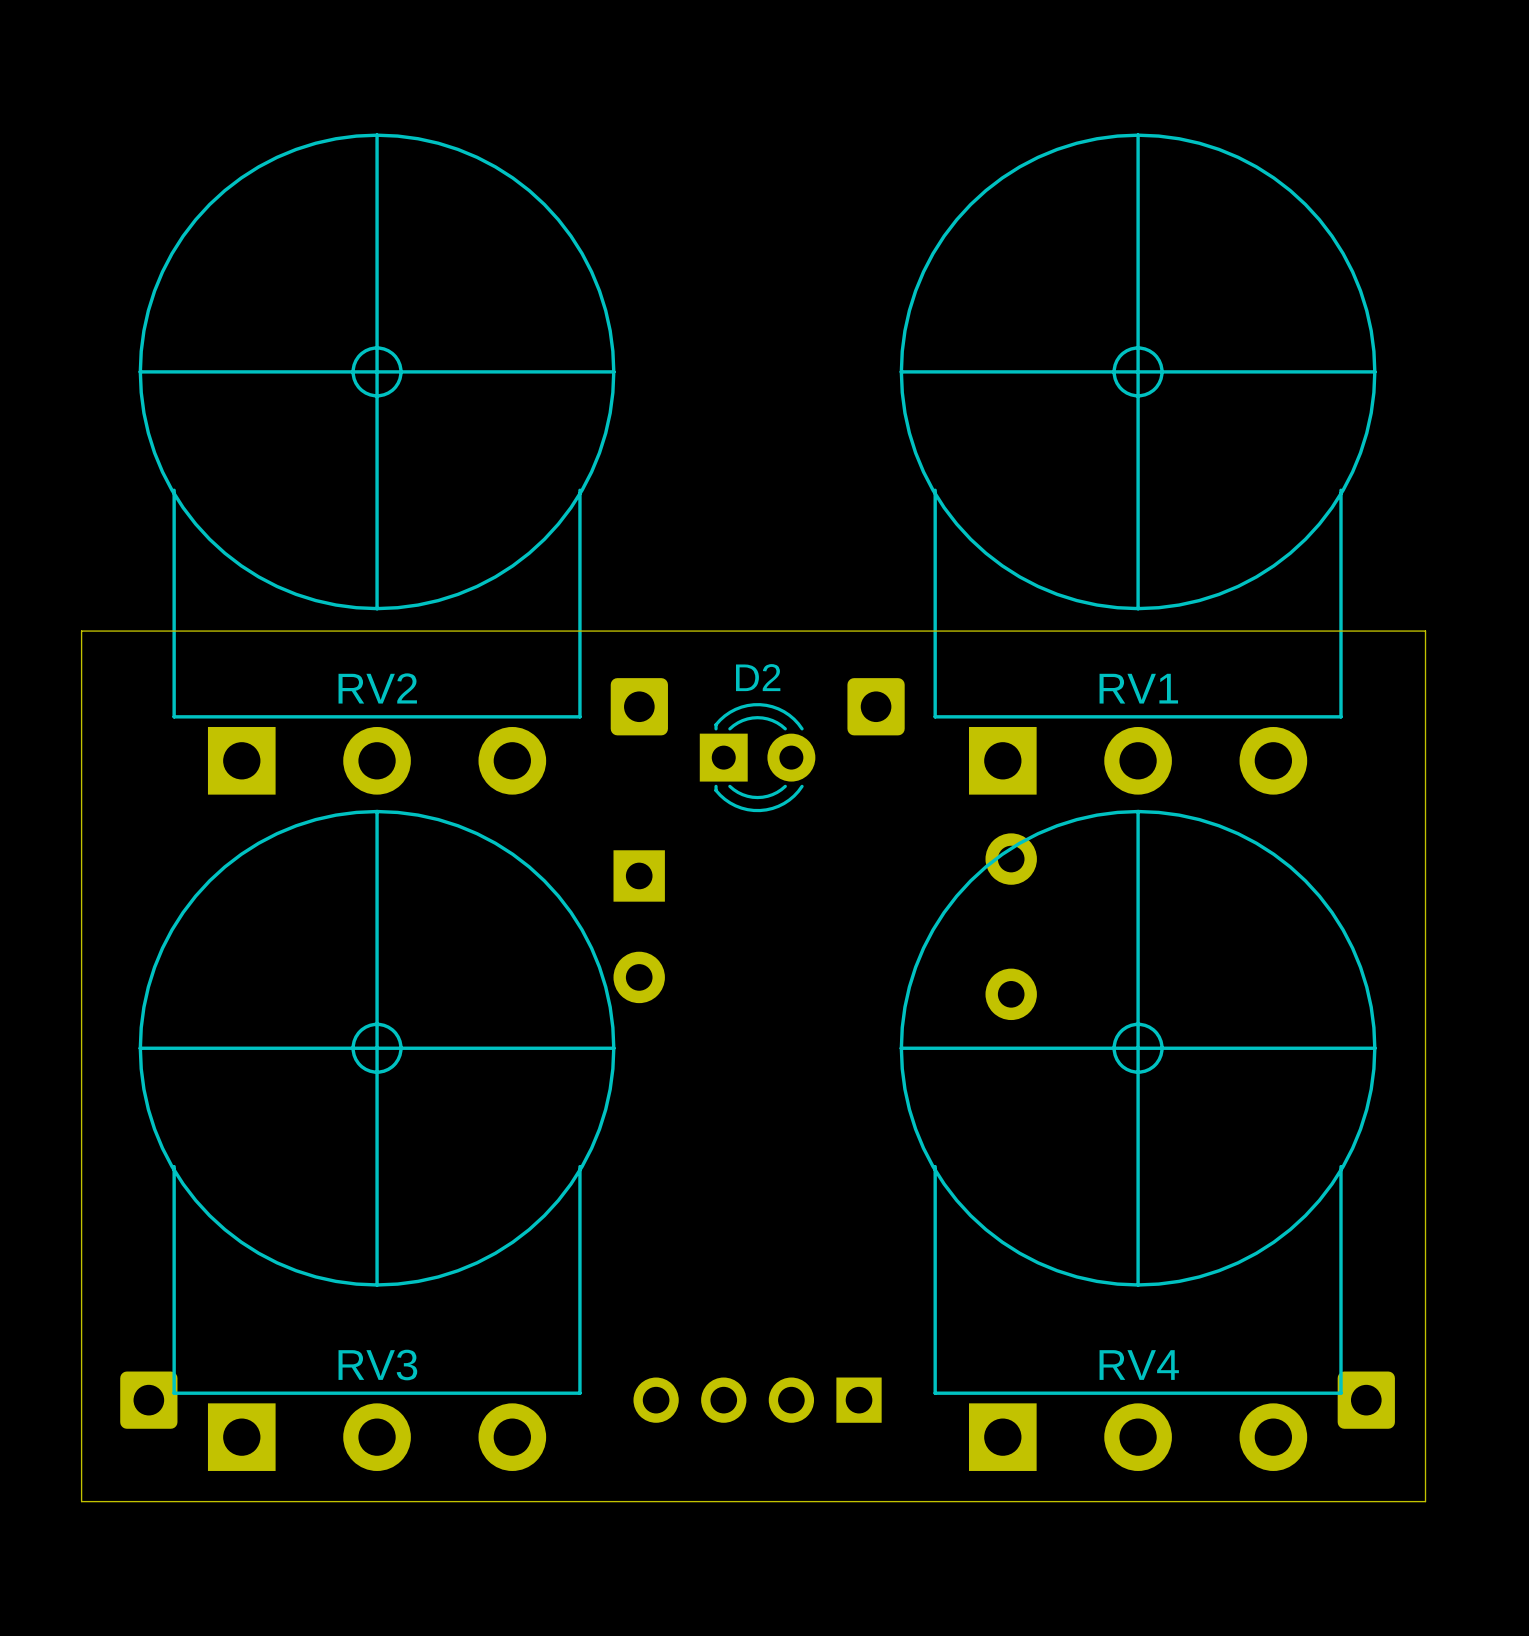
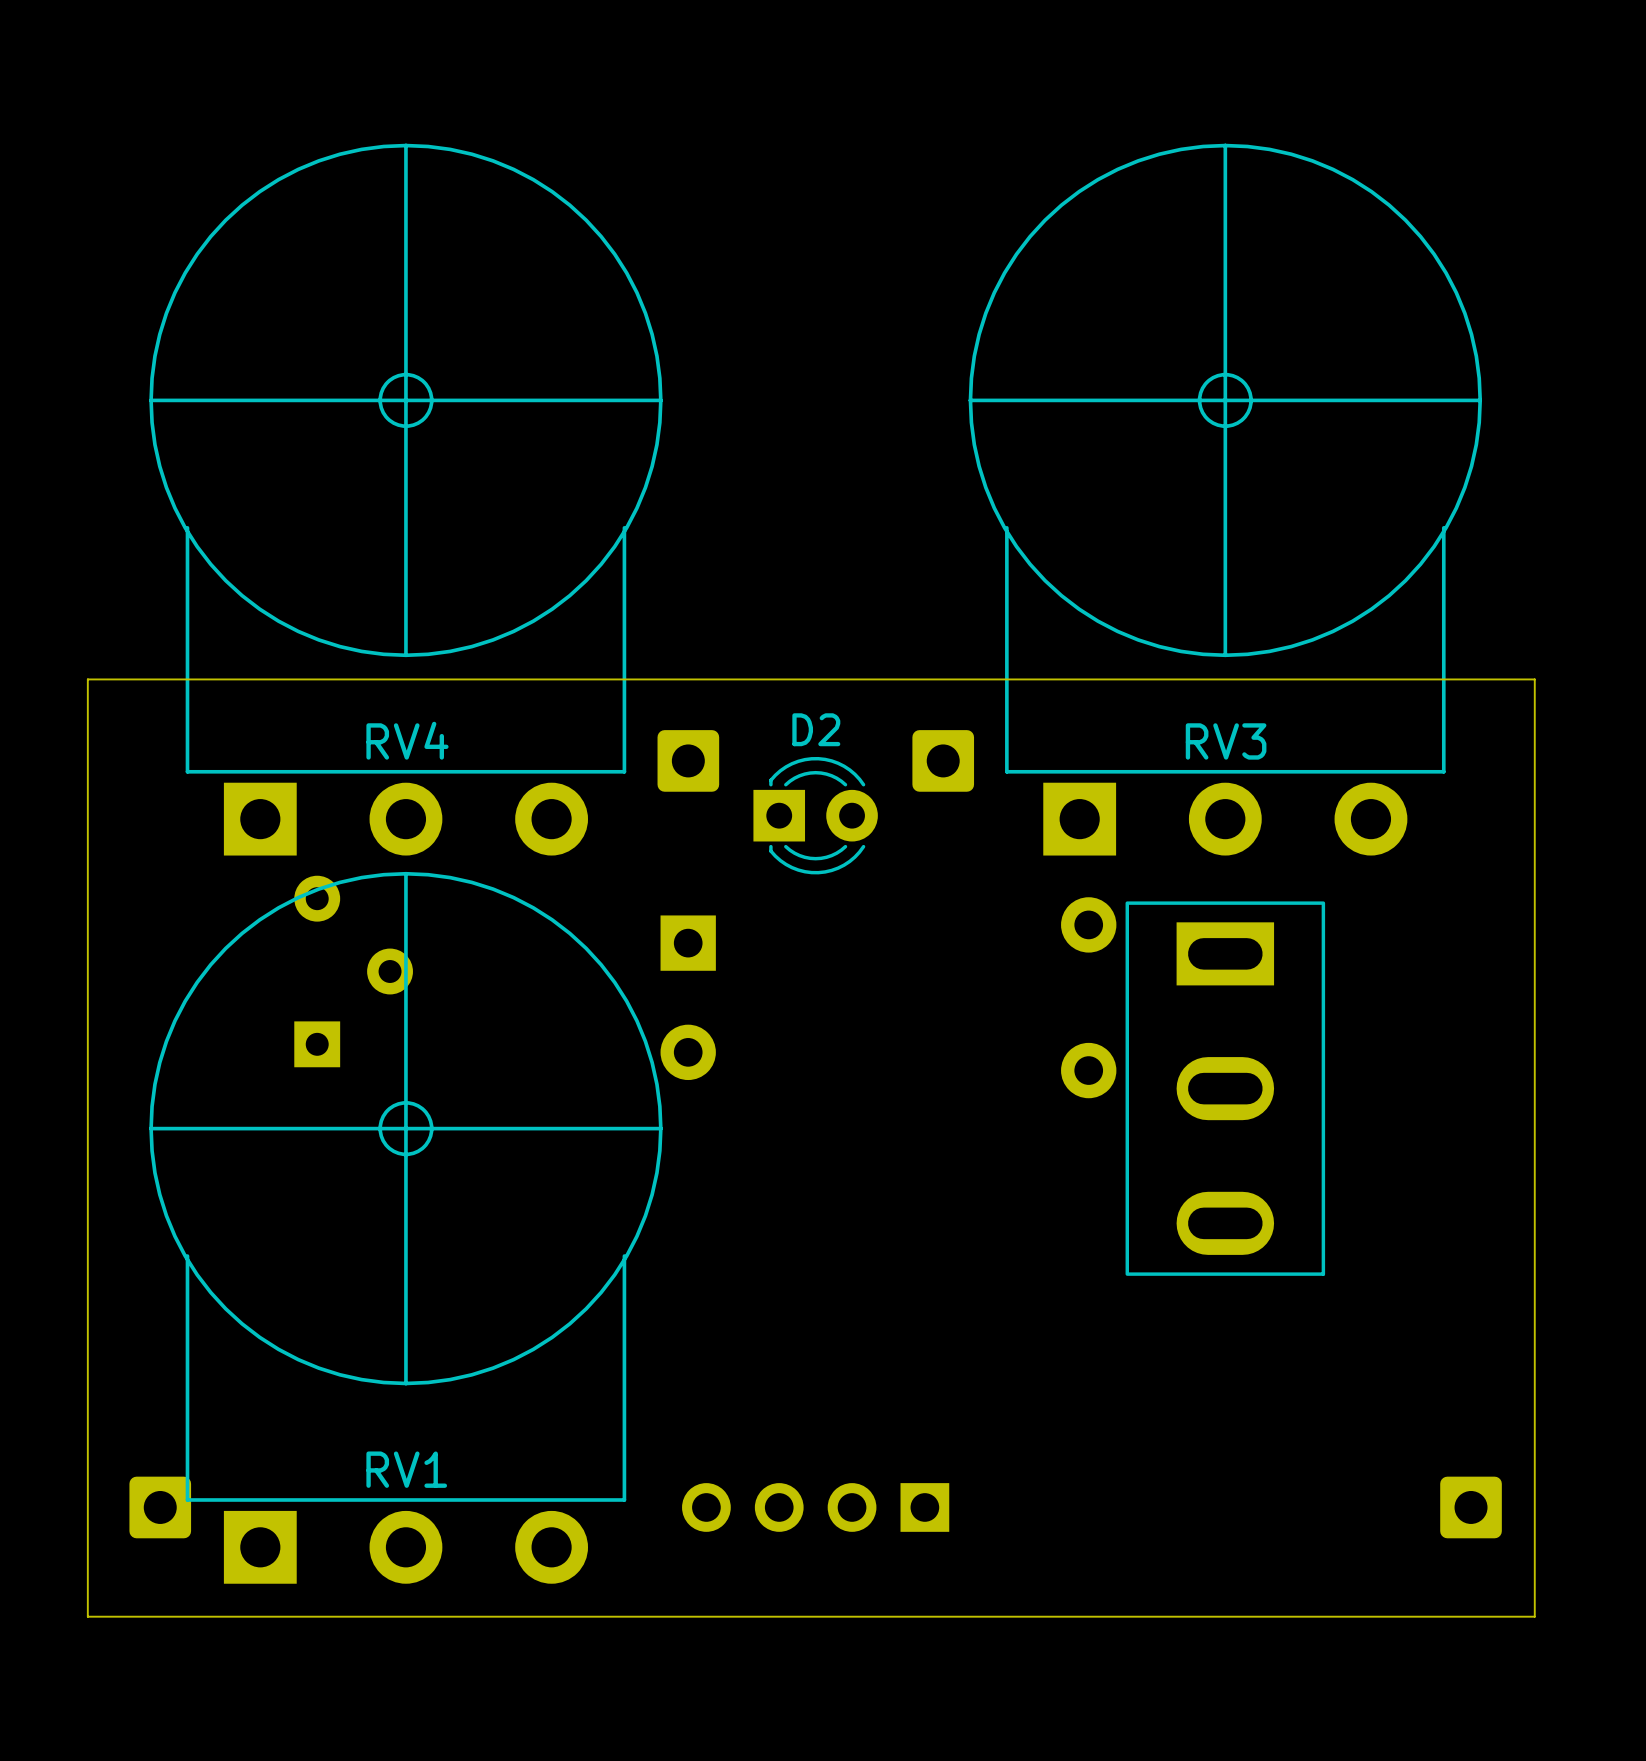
RV2 name: RV2 (377, 688) -> RV4 (407, 740)
RV1 name: RV1 (1138, 688) -> RV3 (1226, 741)
part: none -> (353, 971)
part: none -> (1225, 1088)
RV4: (1138, 1140) -> none
RV3 name: RV3 (377, 1365) -> RV1 (406, 1469)

